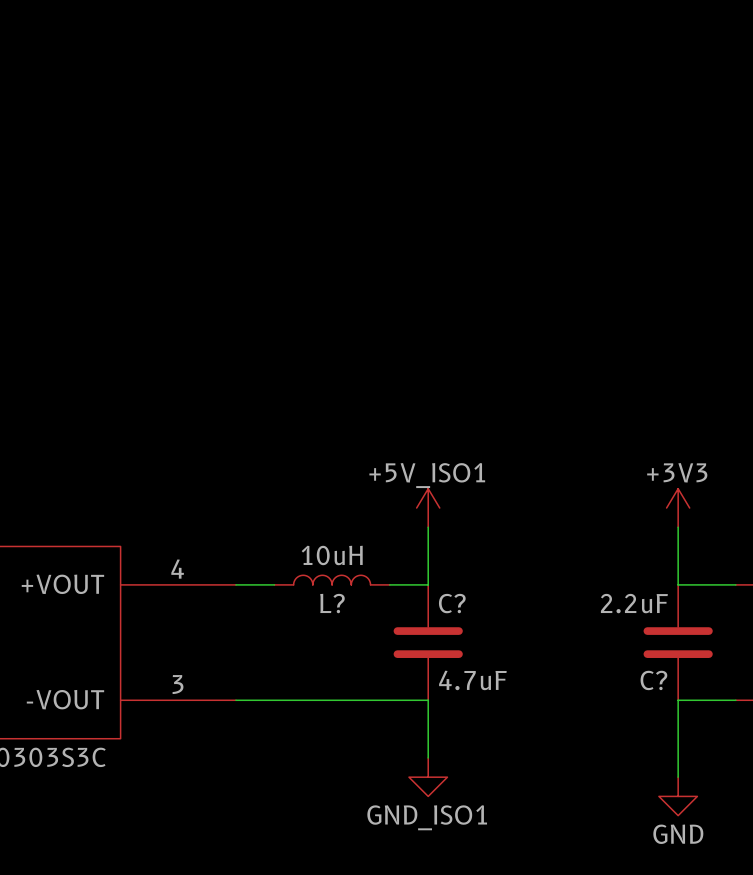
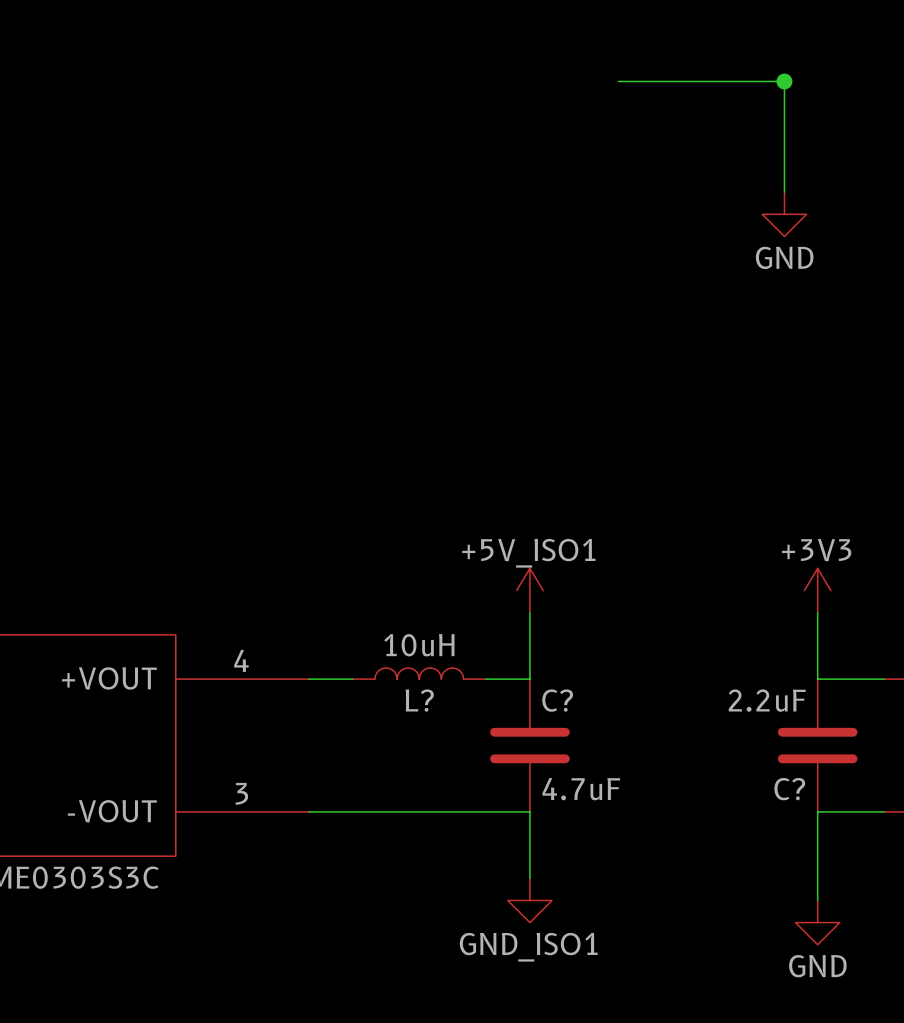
wire: none -> (618, 81) (784, 81) (784, 192)
junction: none -> (784, 81)
power symbol: none -> GND (784, 214)

